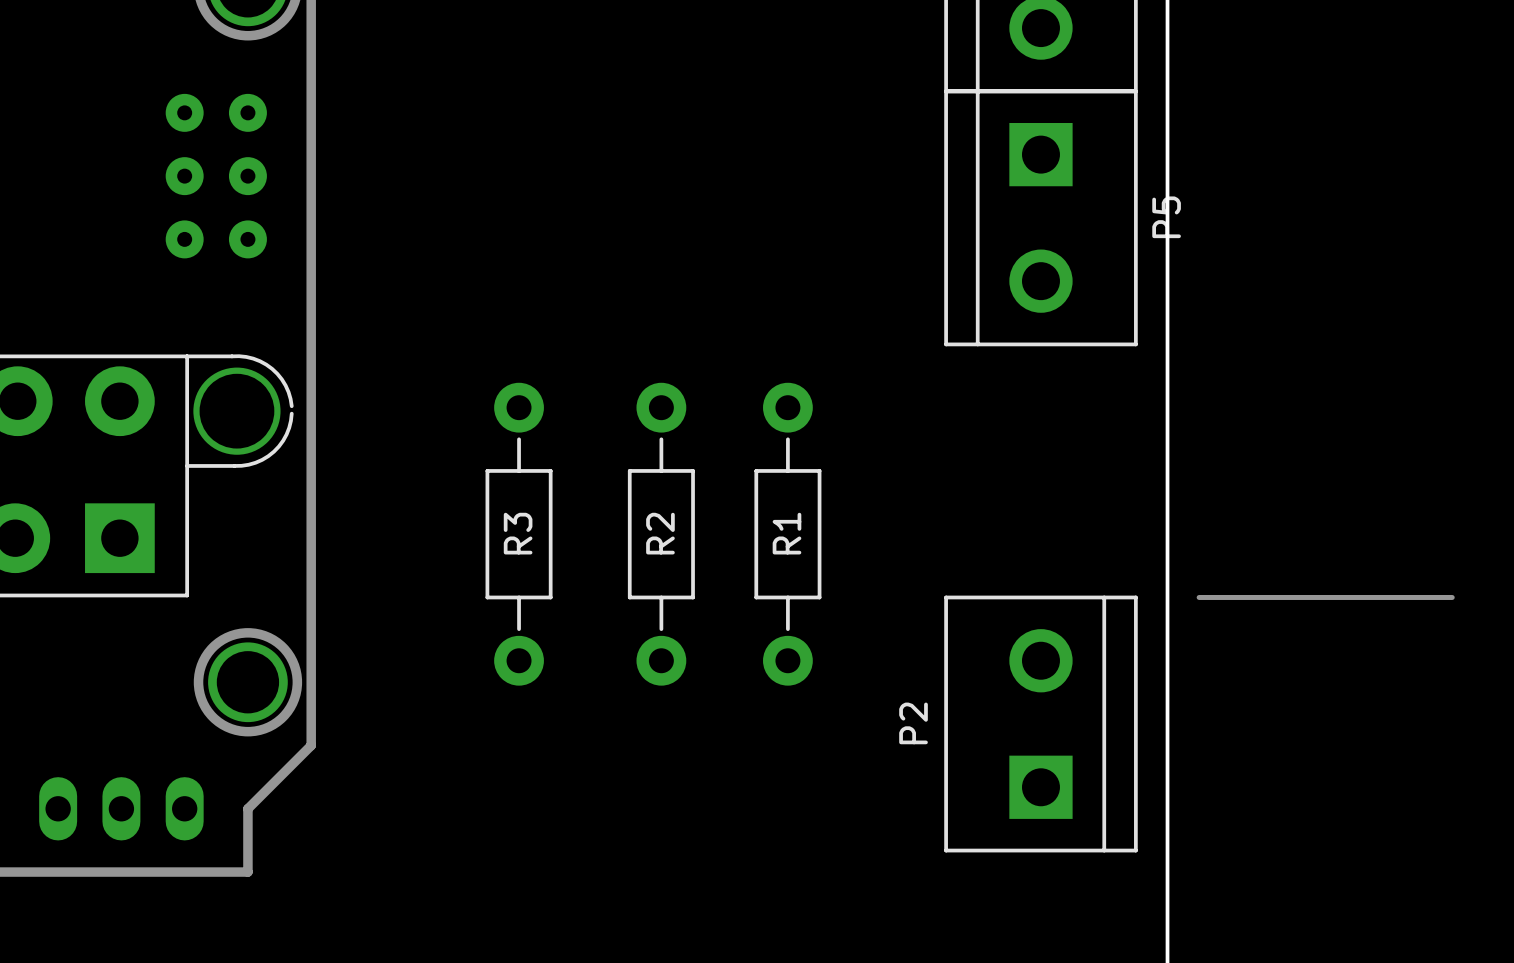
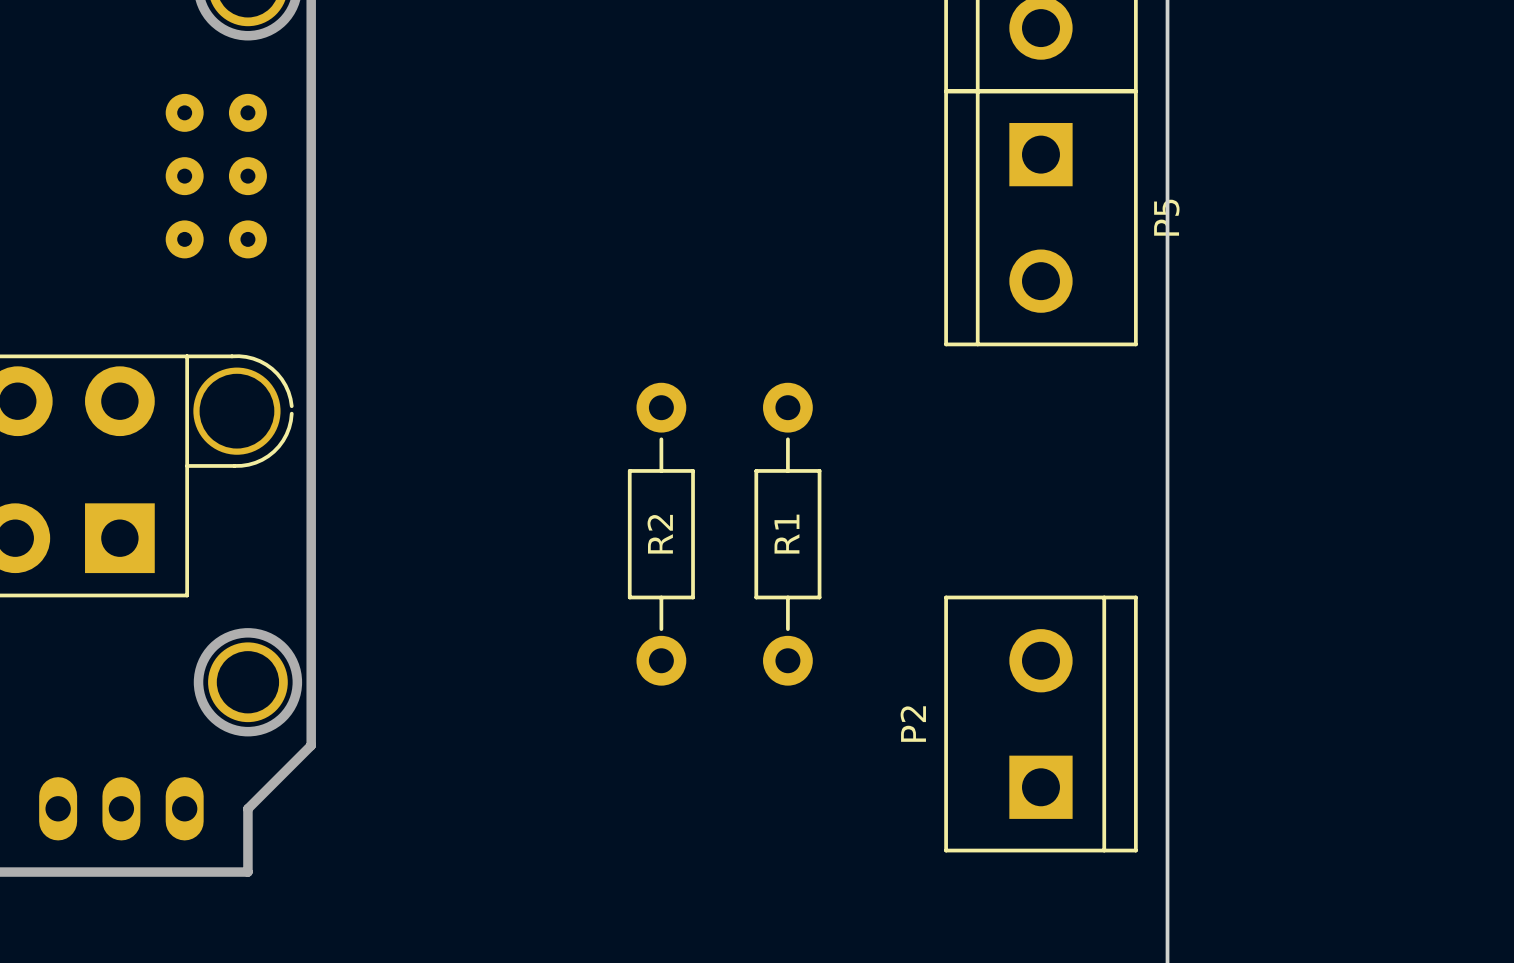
R3: (519, 534) -> none
line: (1199, 597) (1452, 597) -> none

